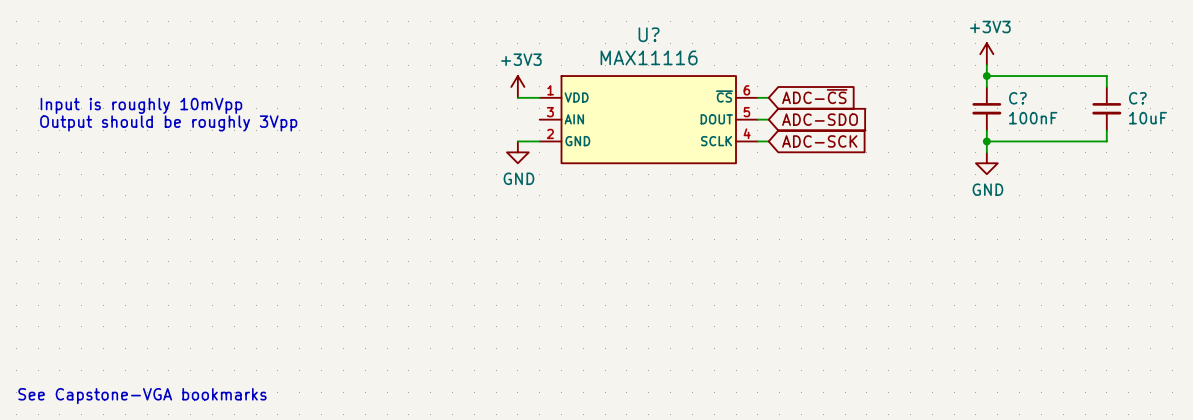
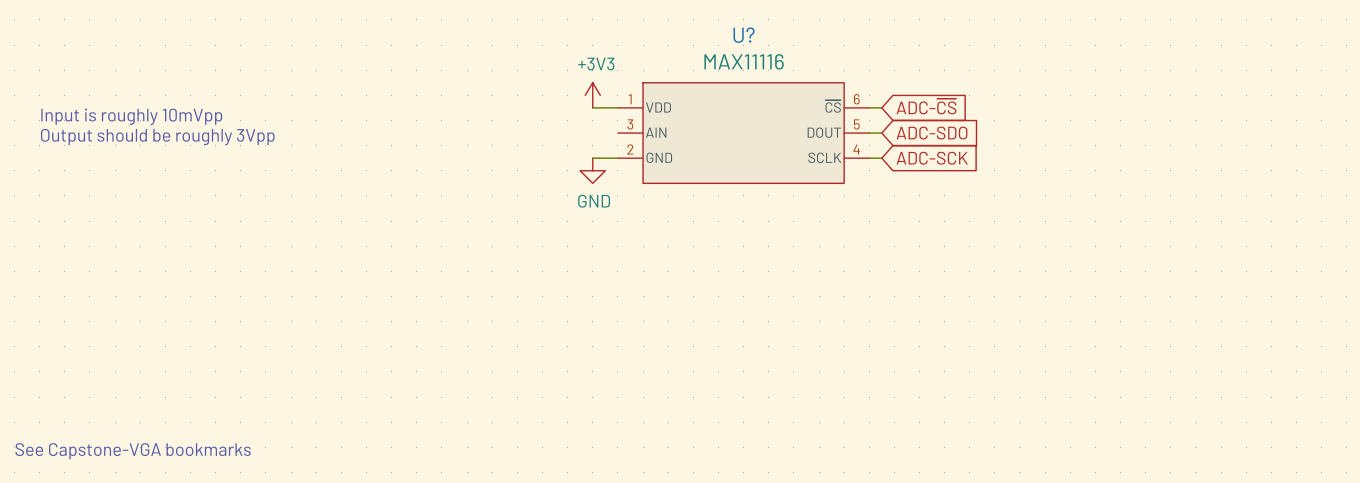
power symbol: +3V3 (986, 54) -> none
wire: (986, 65) (986, 86) -> none
wire: (986, 76) (1106, 76) (1106, 86) -> none
junction: (986, 76) -> none
C?: 100nF (986, 108) -> none
C?: 10uF (1106, 108) -> none
wire: (986, 130) (986, 152) -> none
wire: (1106, 130) (1106, 141) (986, 141) -> none
junction: (986, 141) -> none
power symbol: GND (986, 163) -> none

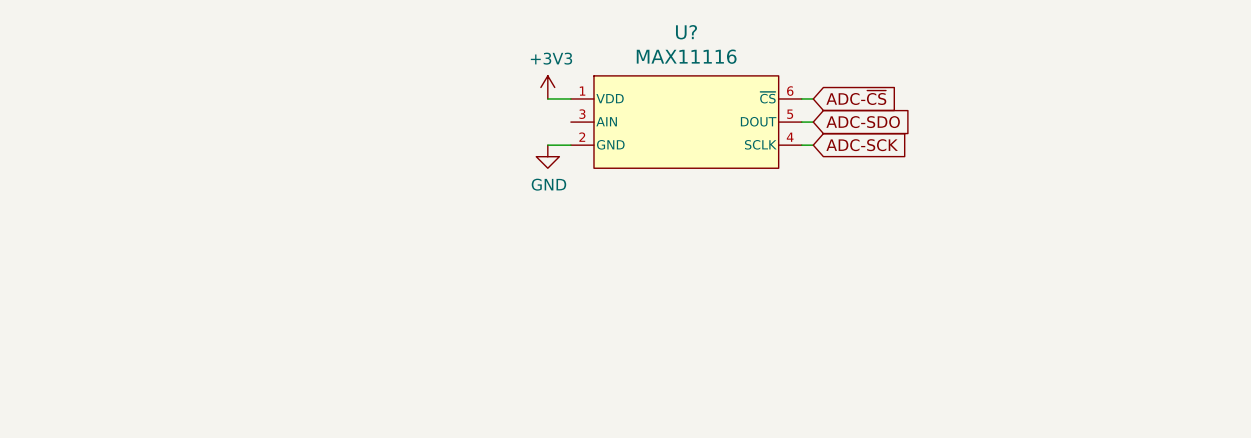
text: Input is roughly 10mVpp (131, 116) -> none
text: Output should be roughly 3Vpp (157, 137) -> none
text: See Capstone-VGA bookmarks (133, 451) -> none

